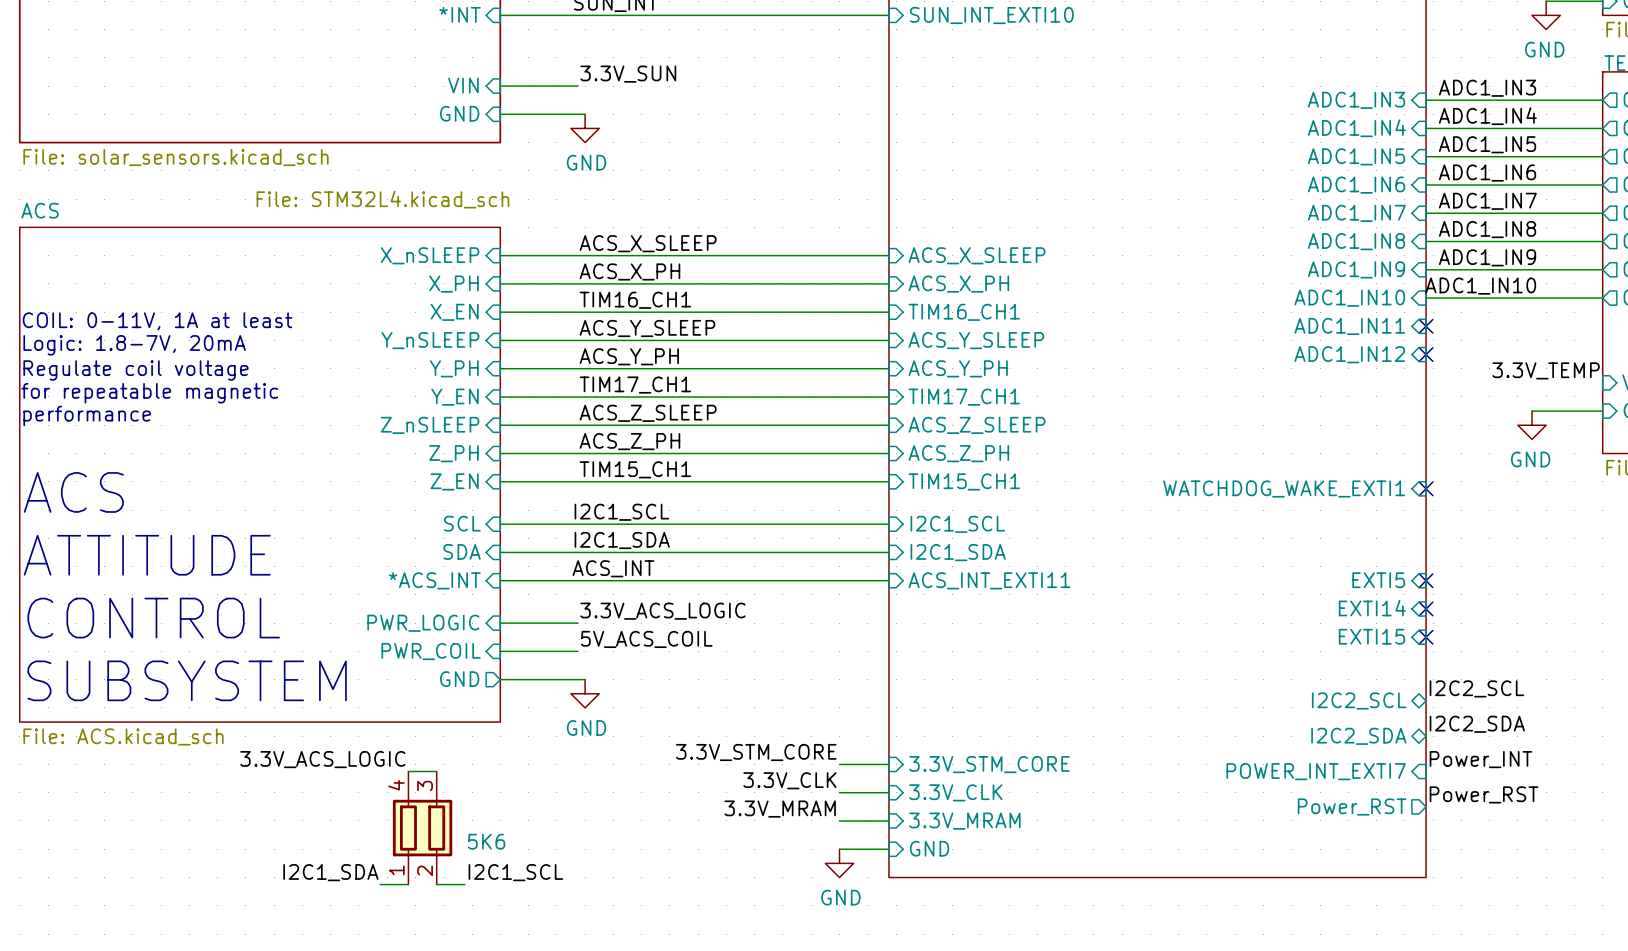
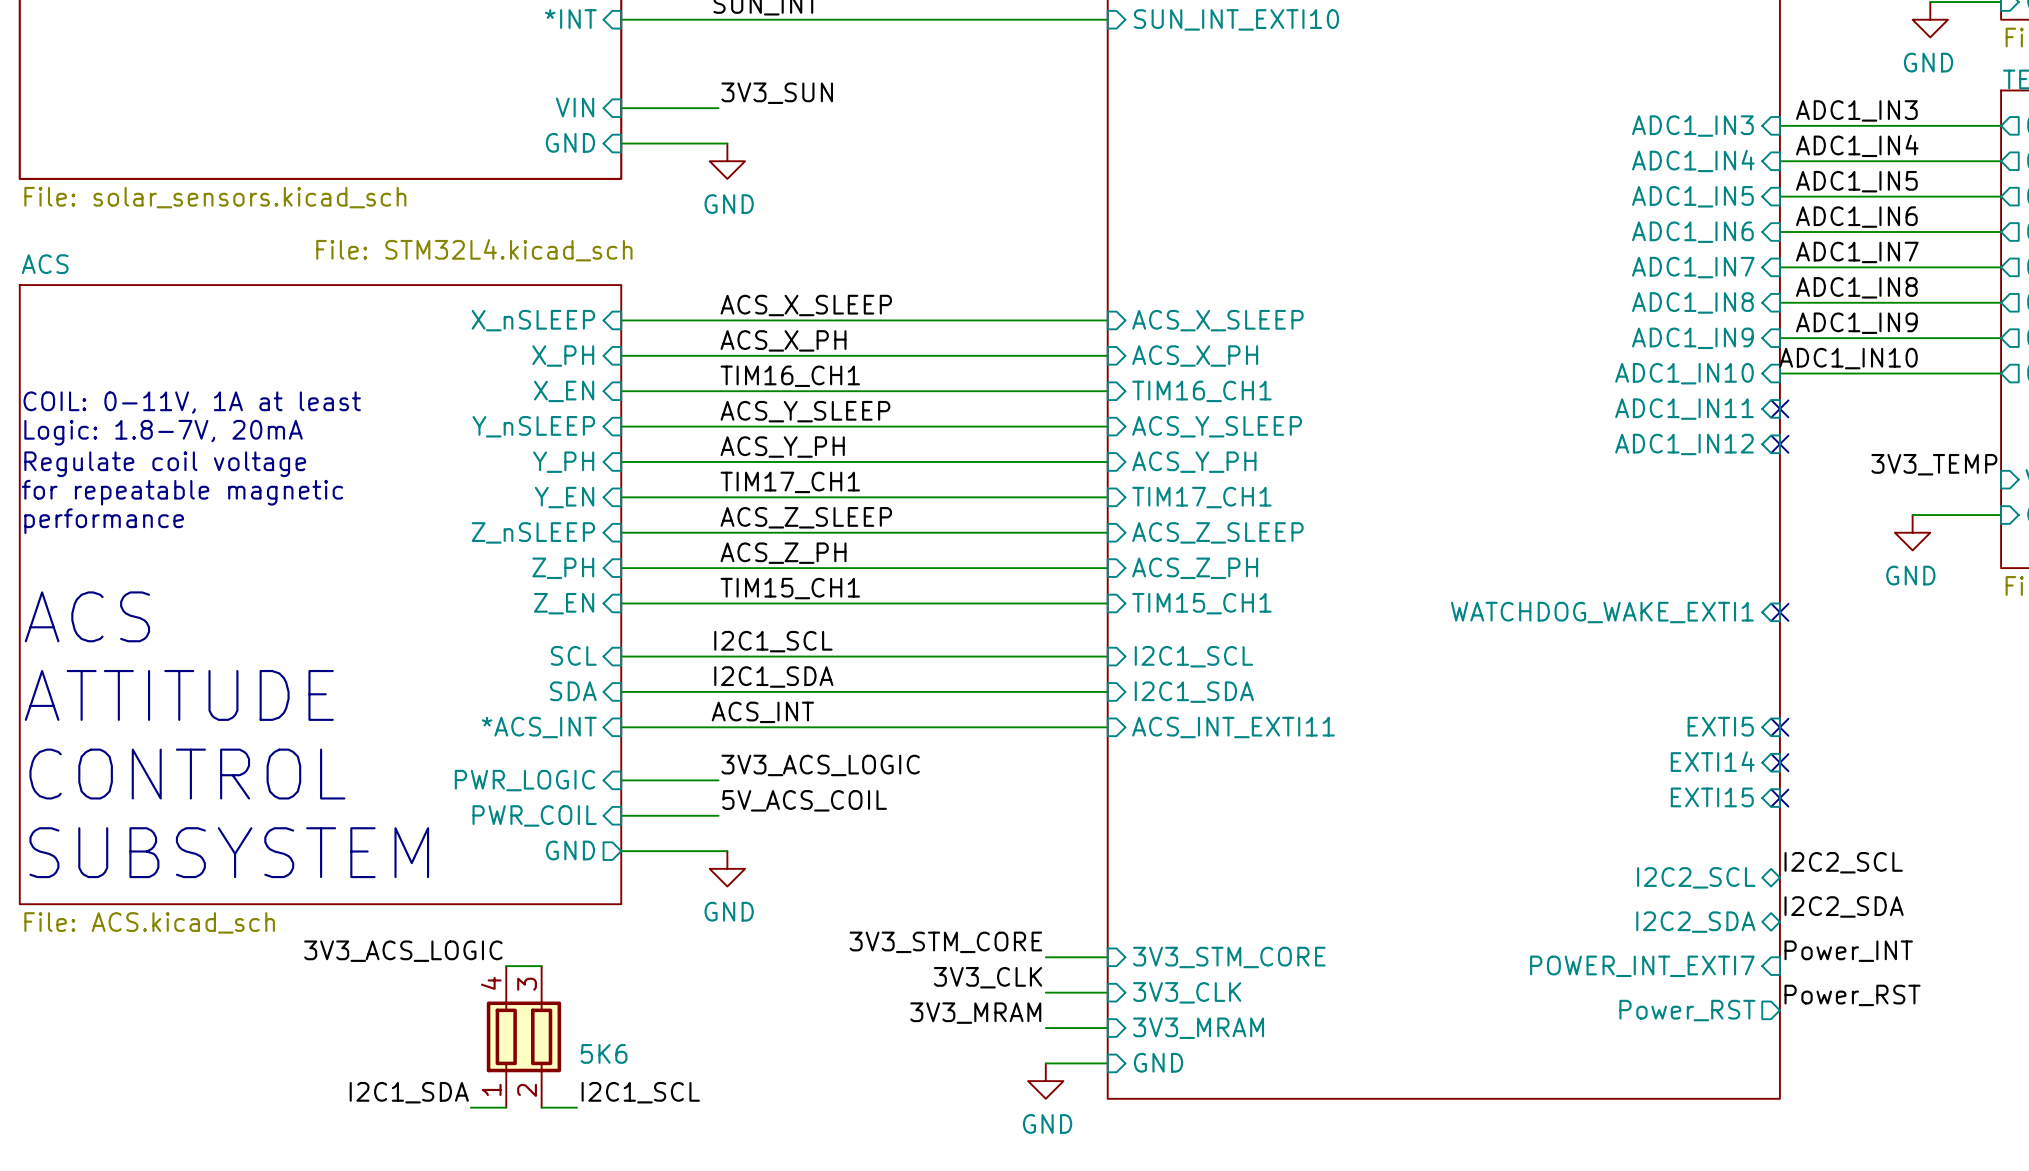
label: 3.3V_SUN (628, 74) -> 3V3_SUN (777, 93)
label: 3.3V_TEMP (1546, 370) -> 3V3_TEMP (1934, 464)
label: 3.3V_ACS_LOGIC (662, 611) -> 3V3_ACS_LOGIC (820, 765)
label: 3.3V_STM_CORE (756, 752) -> 3V3_STM_CORE (945, 942)
label: 3.3V_ACS_LOGIC (322, 759) -> 3V3_ACS_LOGIC (403, 951)
sheet pin: 3.3V_STM_CORE (989, 764) -> 3V3_STM_CORE (1229, 957)
label: 3.3V_CLK (789, 780) -> 3V3_CLK (987, 977)
sheet pin: 3.3V_CLK (955, 792) -> 3V3_CLK (1187, 992)
label: 3.3V_MRAM (780, 809) -> 3V3_MRAM (975, 1013)
sheet pin: 3.3V_MRAM (964, 821) -> 3V3_MRAM (1198, 1028)

